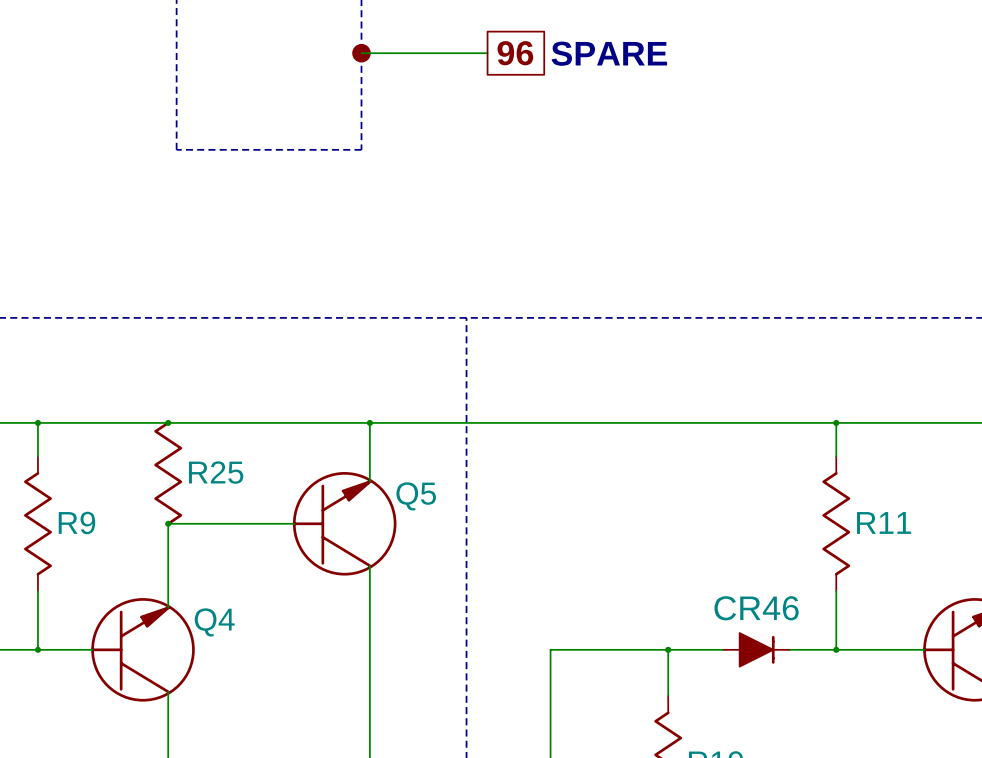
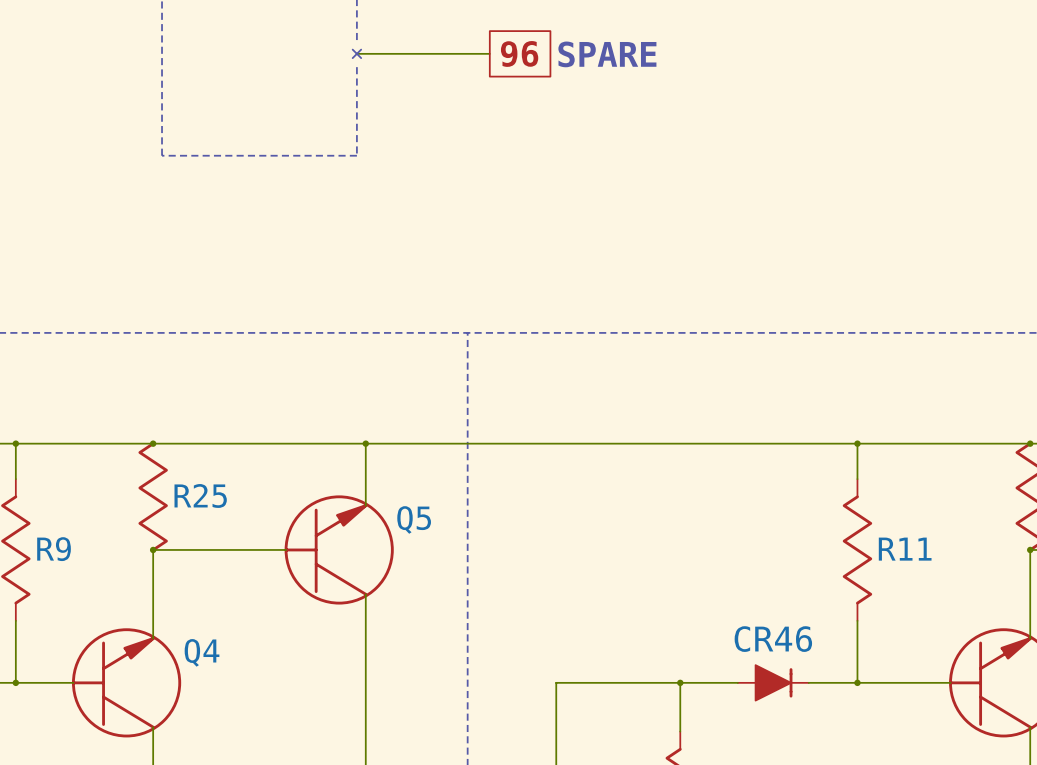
part: (361, 53) -> none
no-connect mark: none -> (356, 53)

